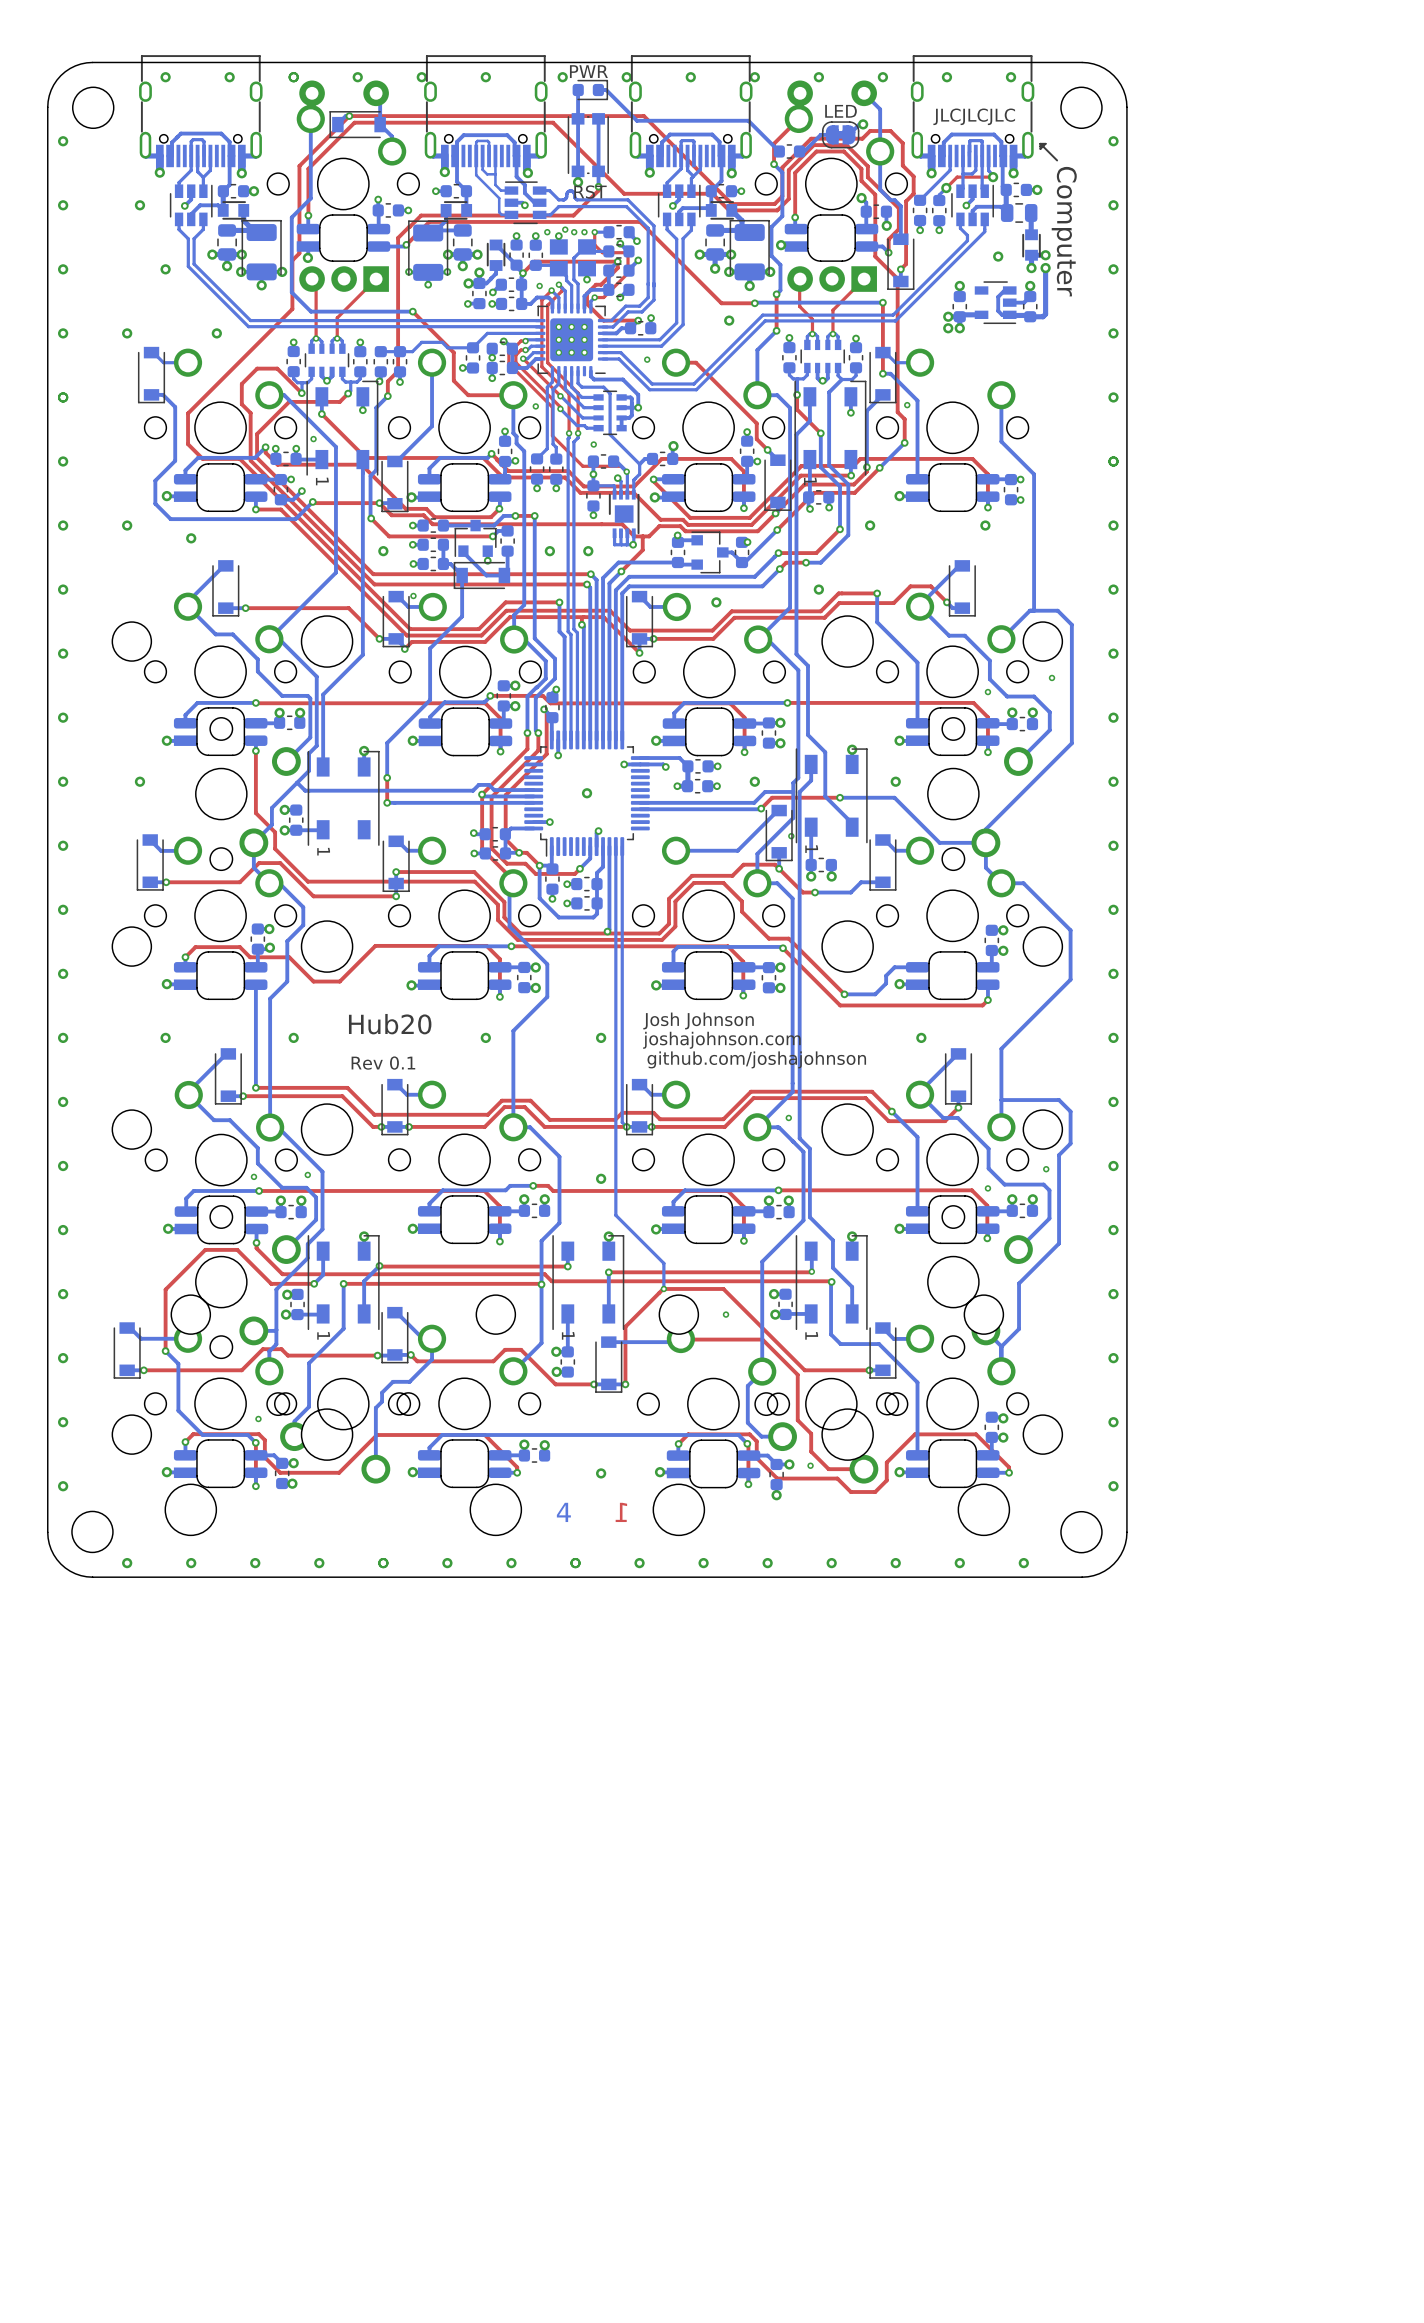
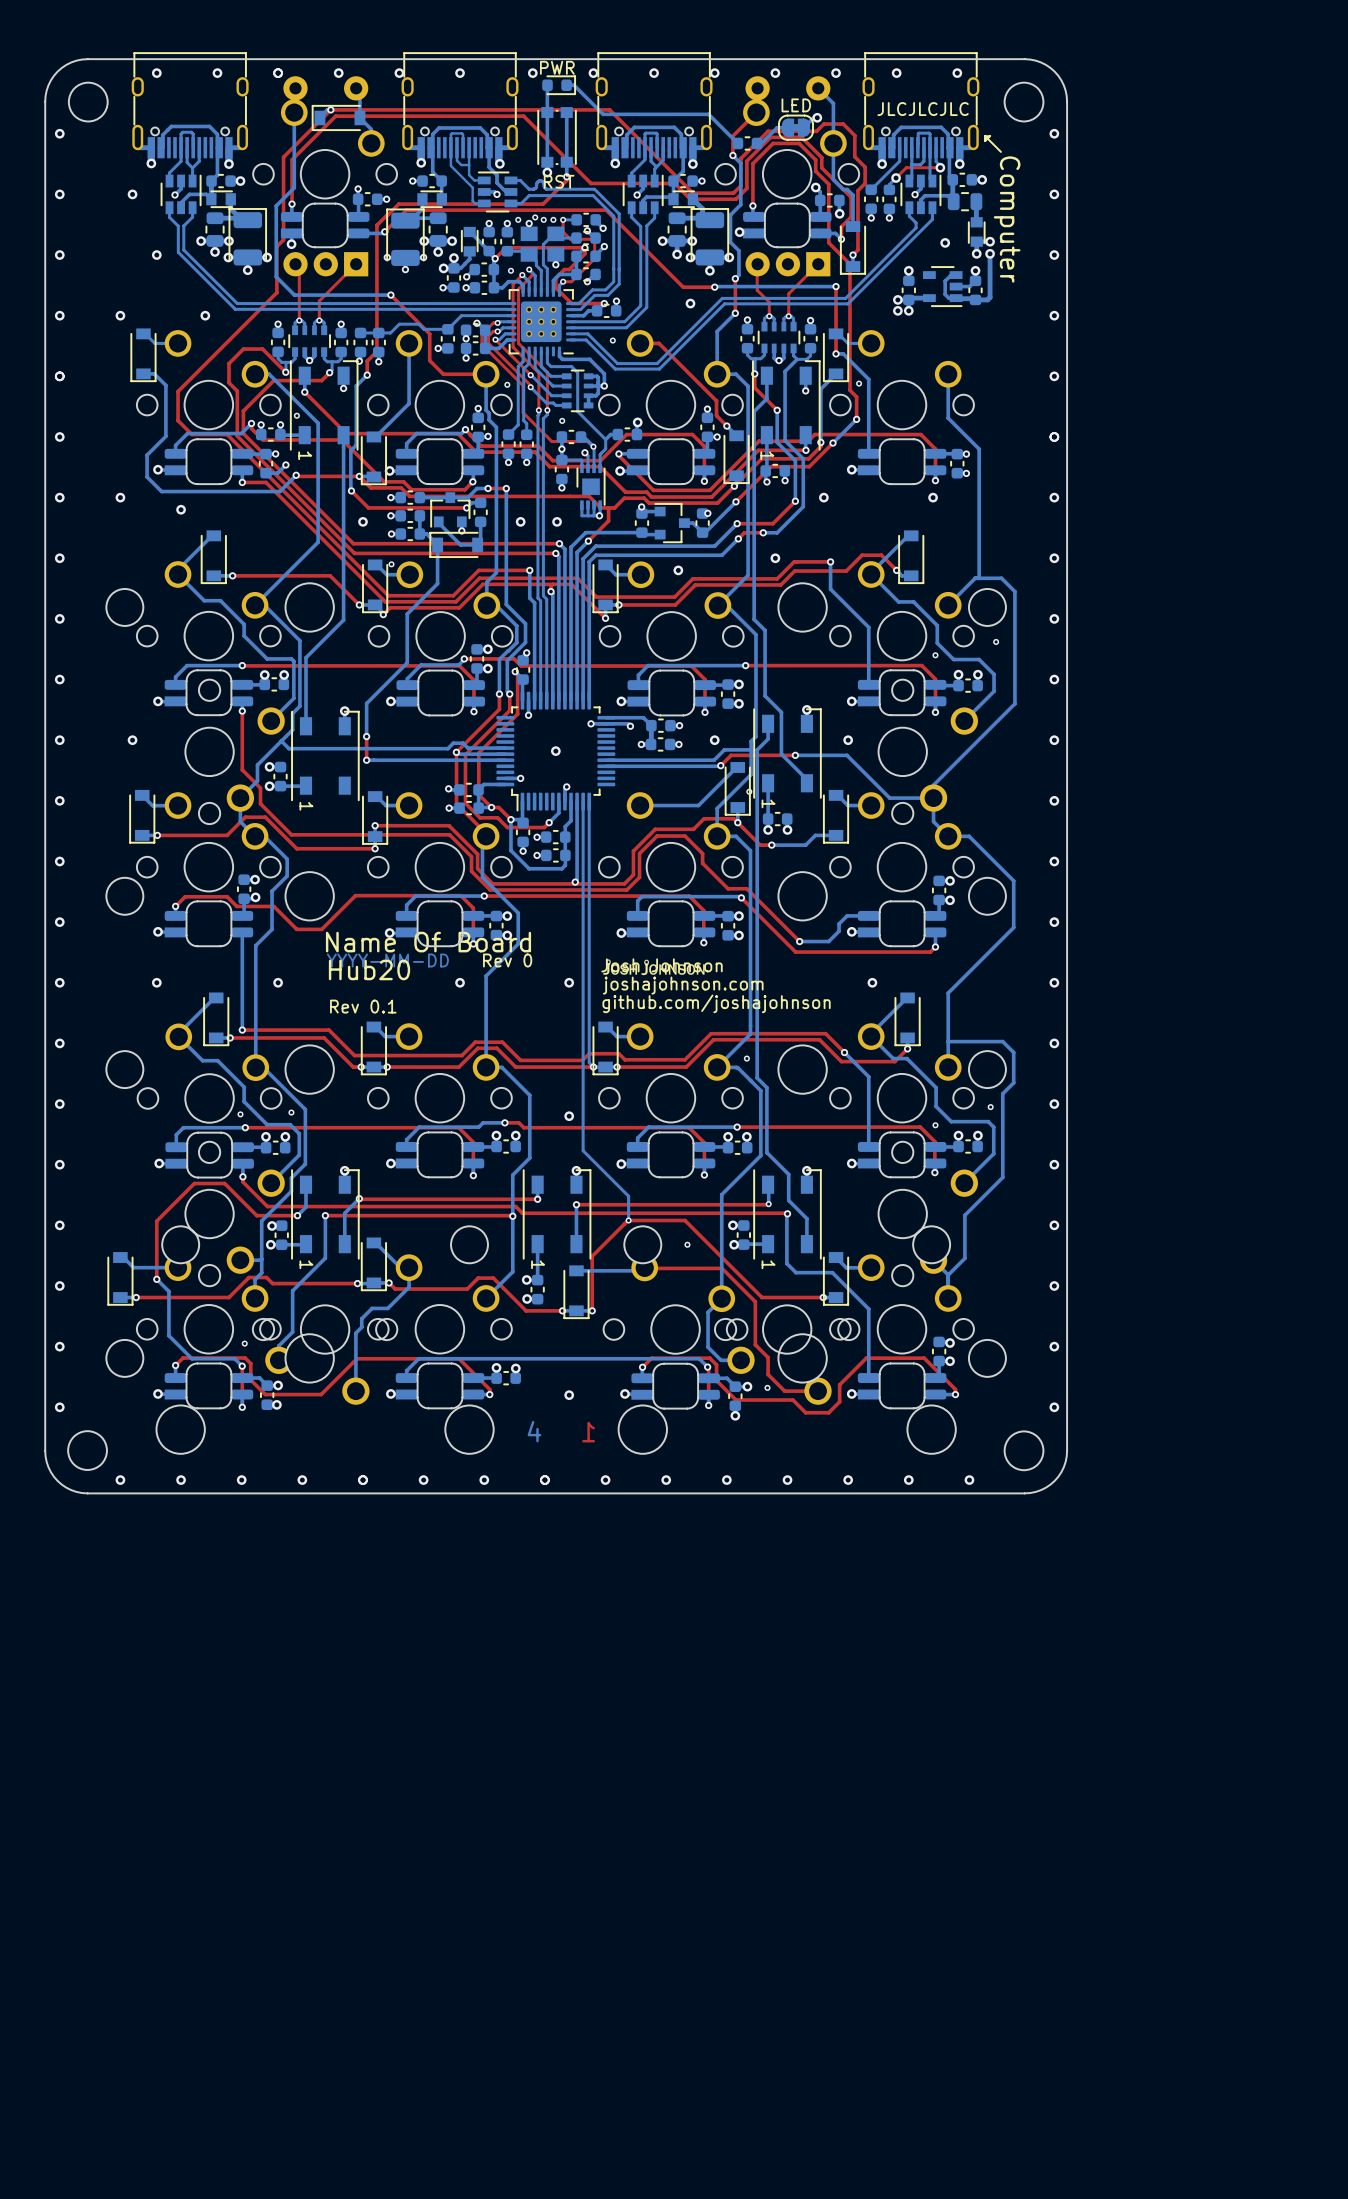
drawing: none -> [325, 931, 533, 1014]
drawing: [348, 1013, 432, 1070] -> none
drawing: none -> [603, 959, 705, 976]

